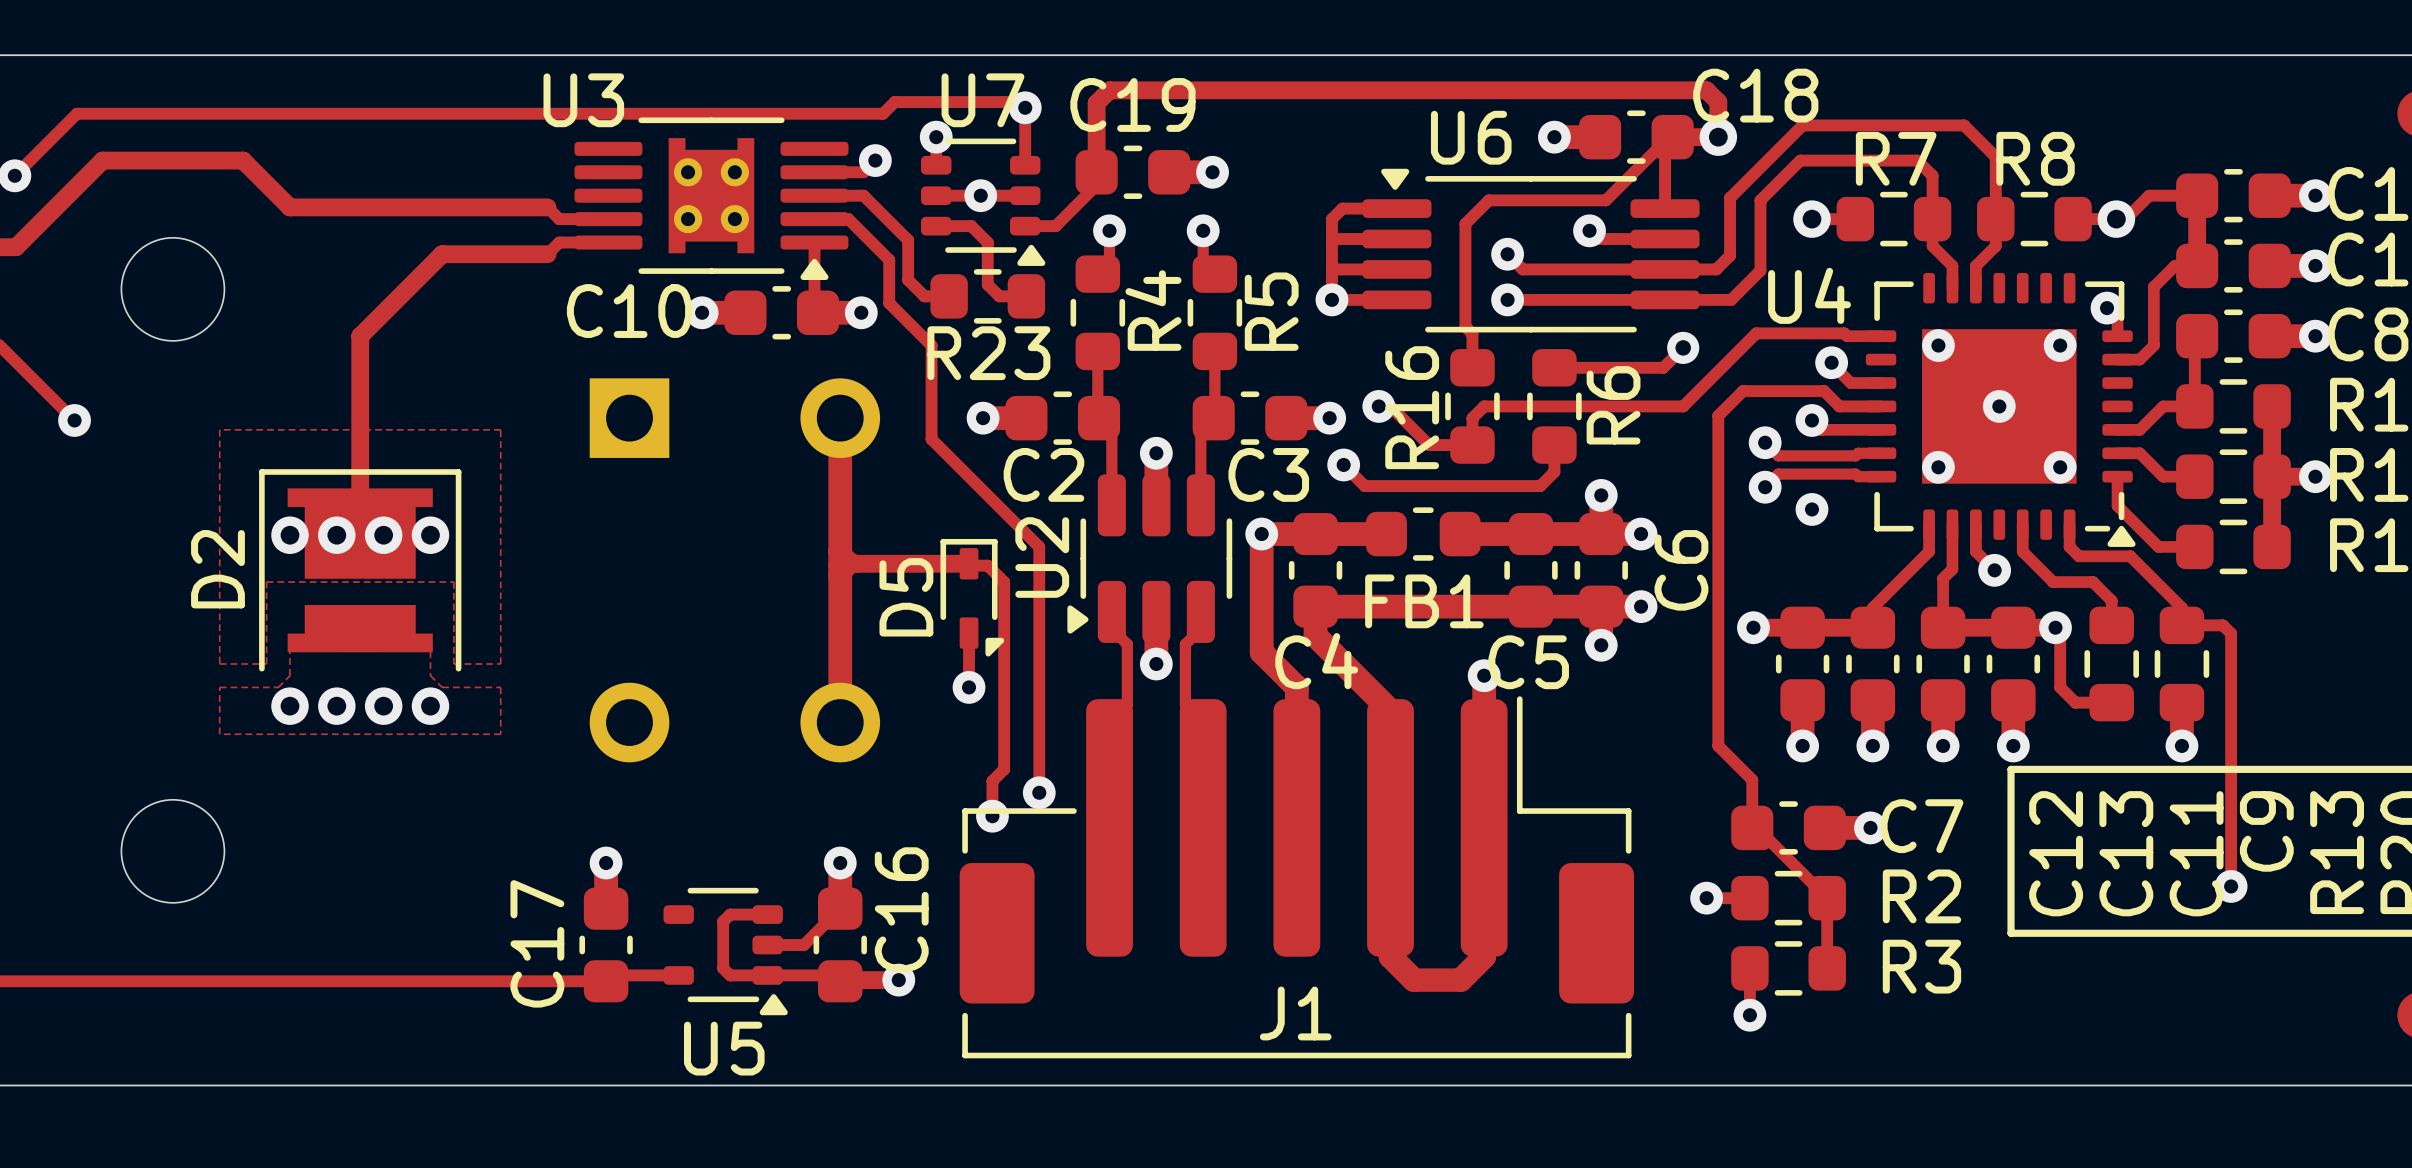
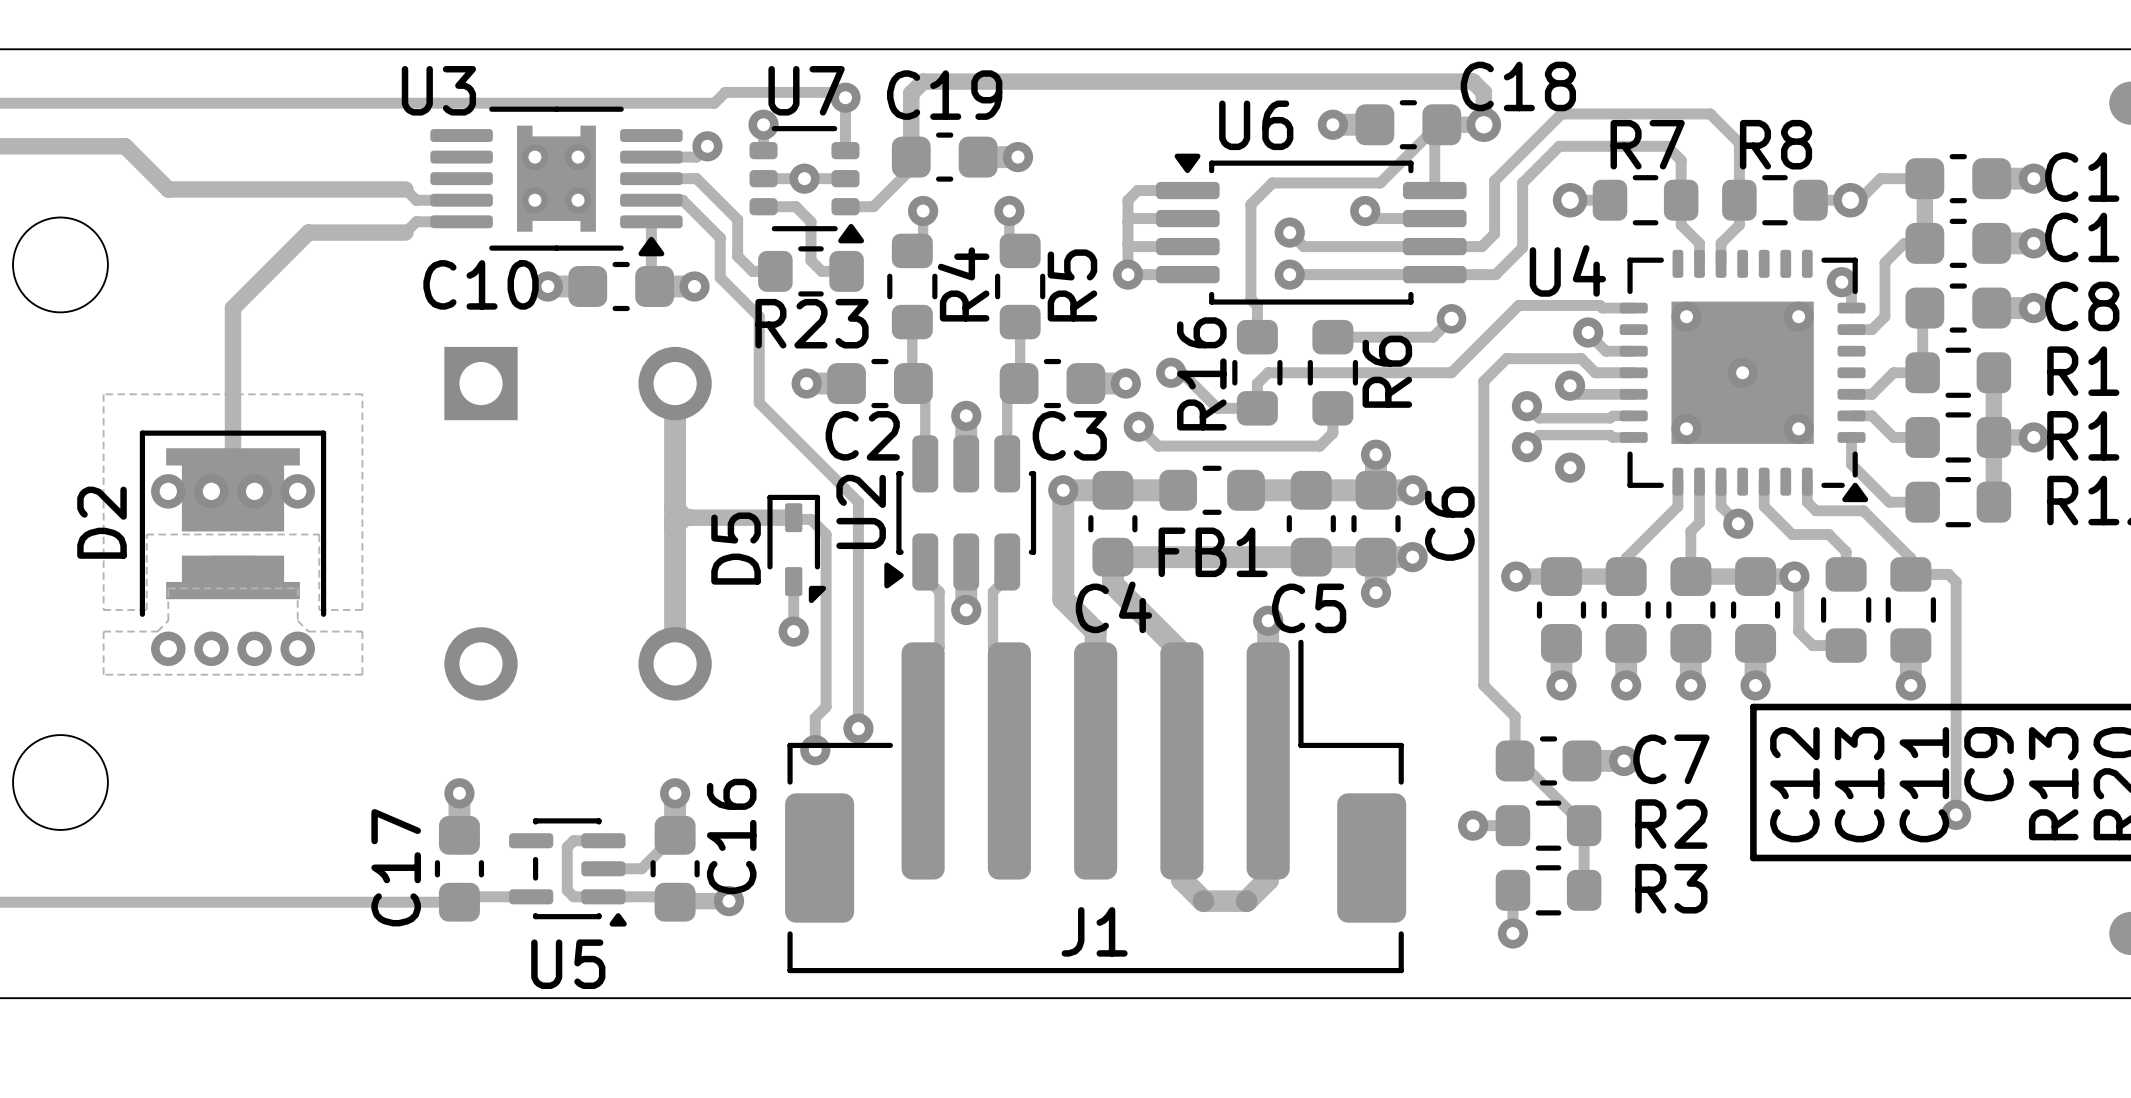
U6 footprint: [1362, 168, 1700, 333] -> [1156, 153, 1467, 305]
U2 footprint: [1067, 474, 1233, 643] -> [884, 435, 1037, 591]
U5 footprint: [663, 887, 788, 1016] -> [509, 818, 627, 927]

